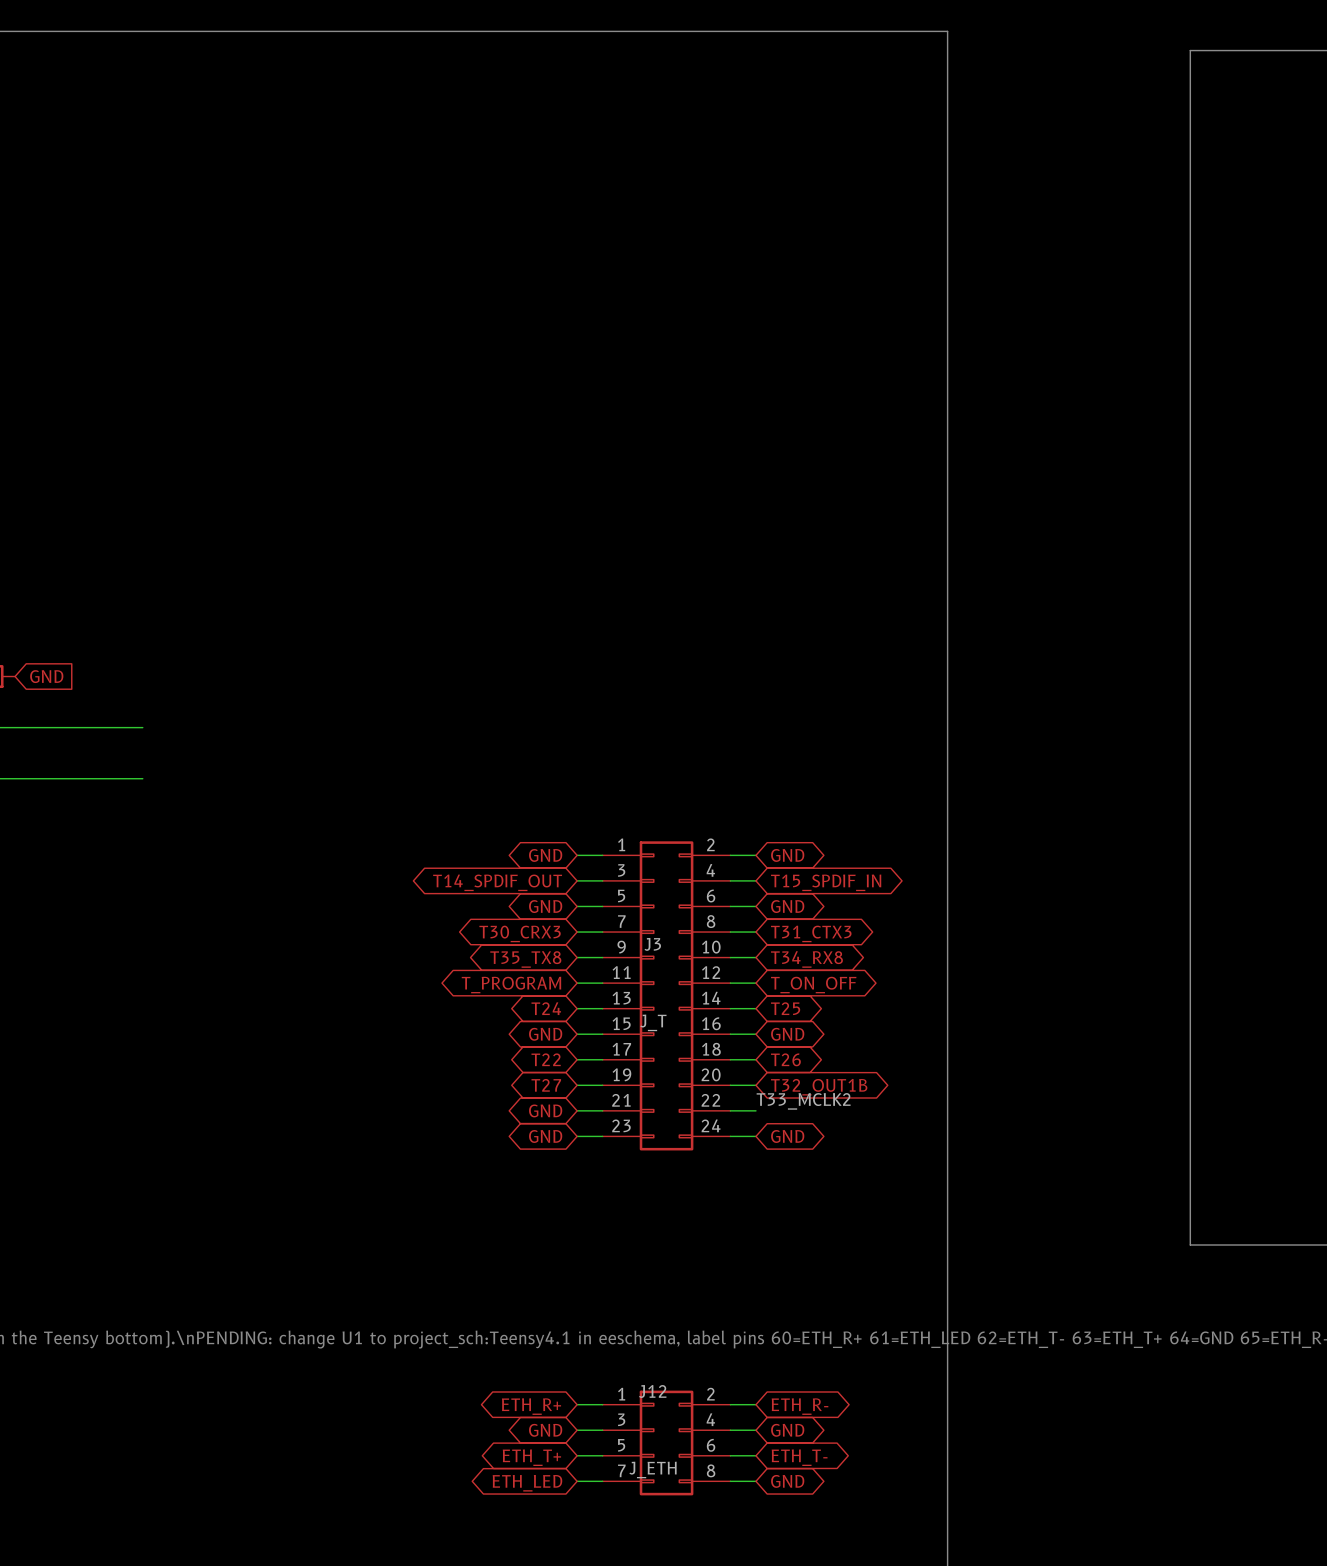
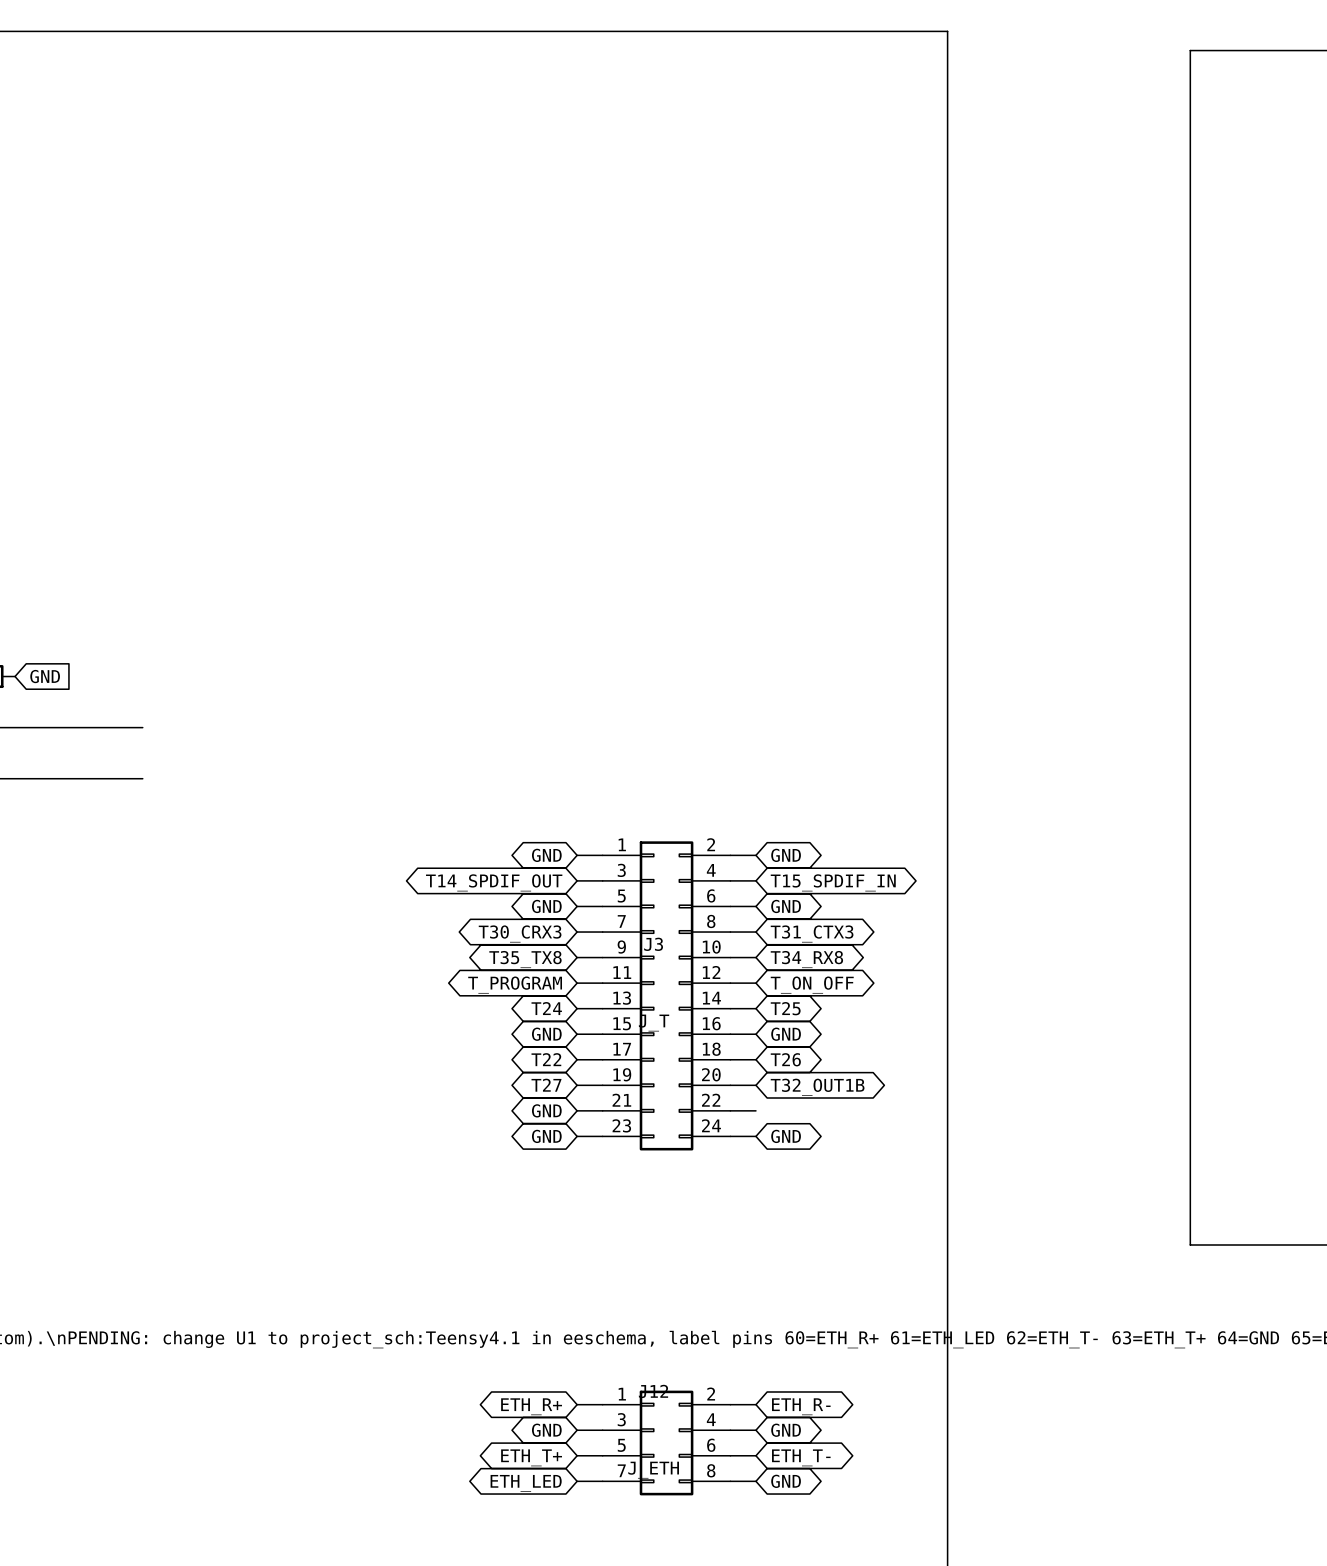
label: T33_MCLK2 (803, 1101) -> none

